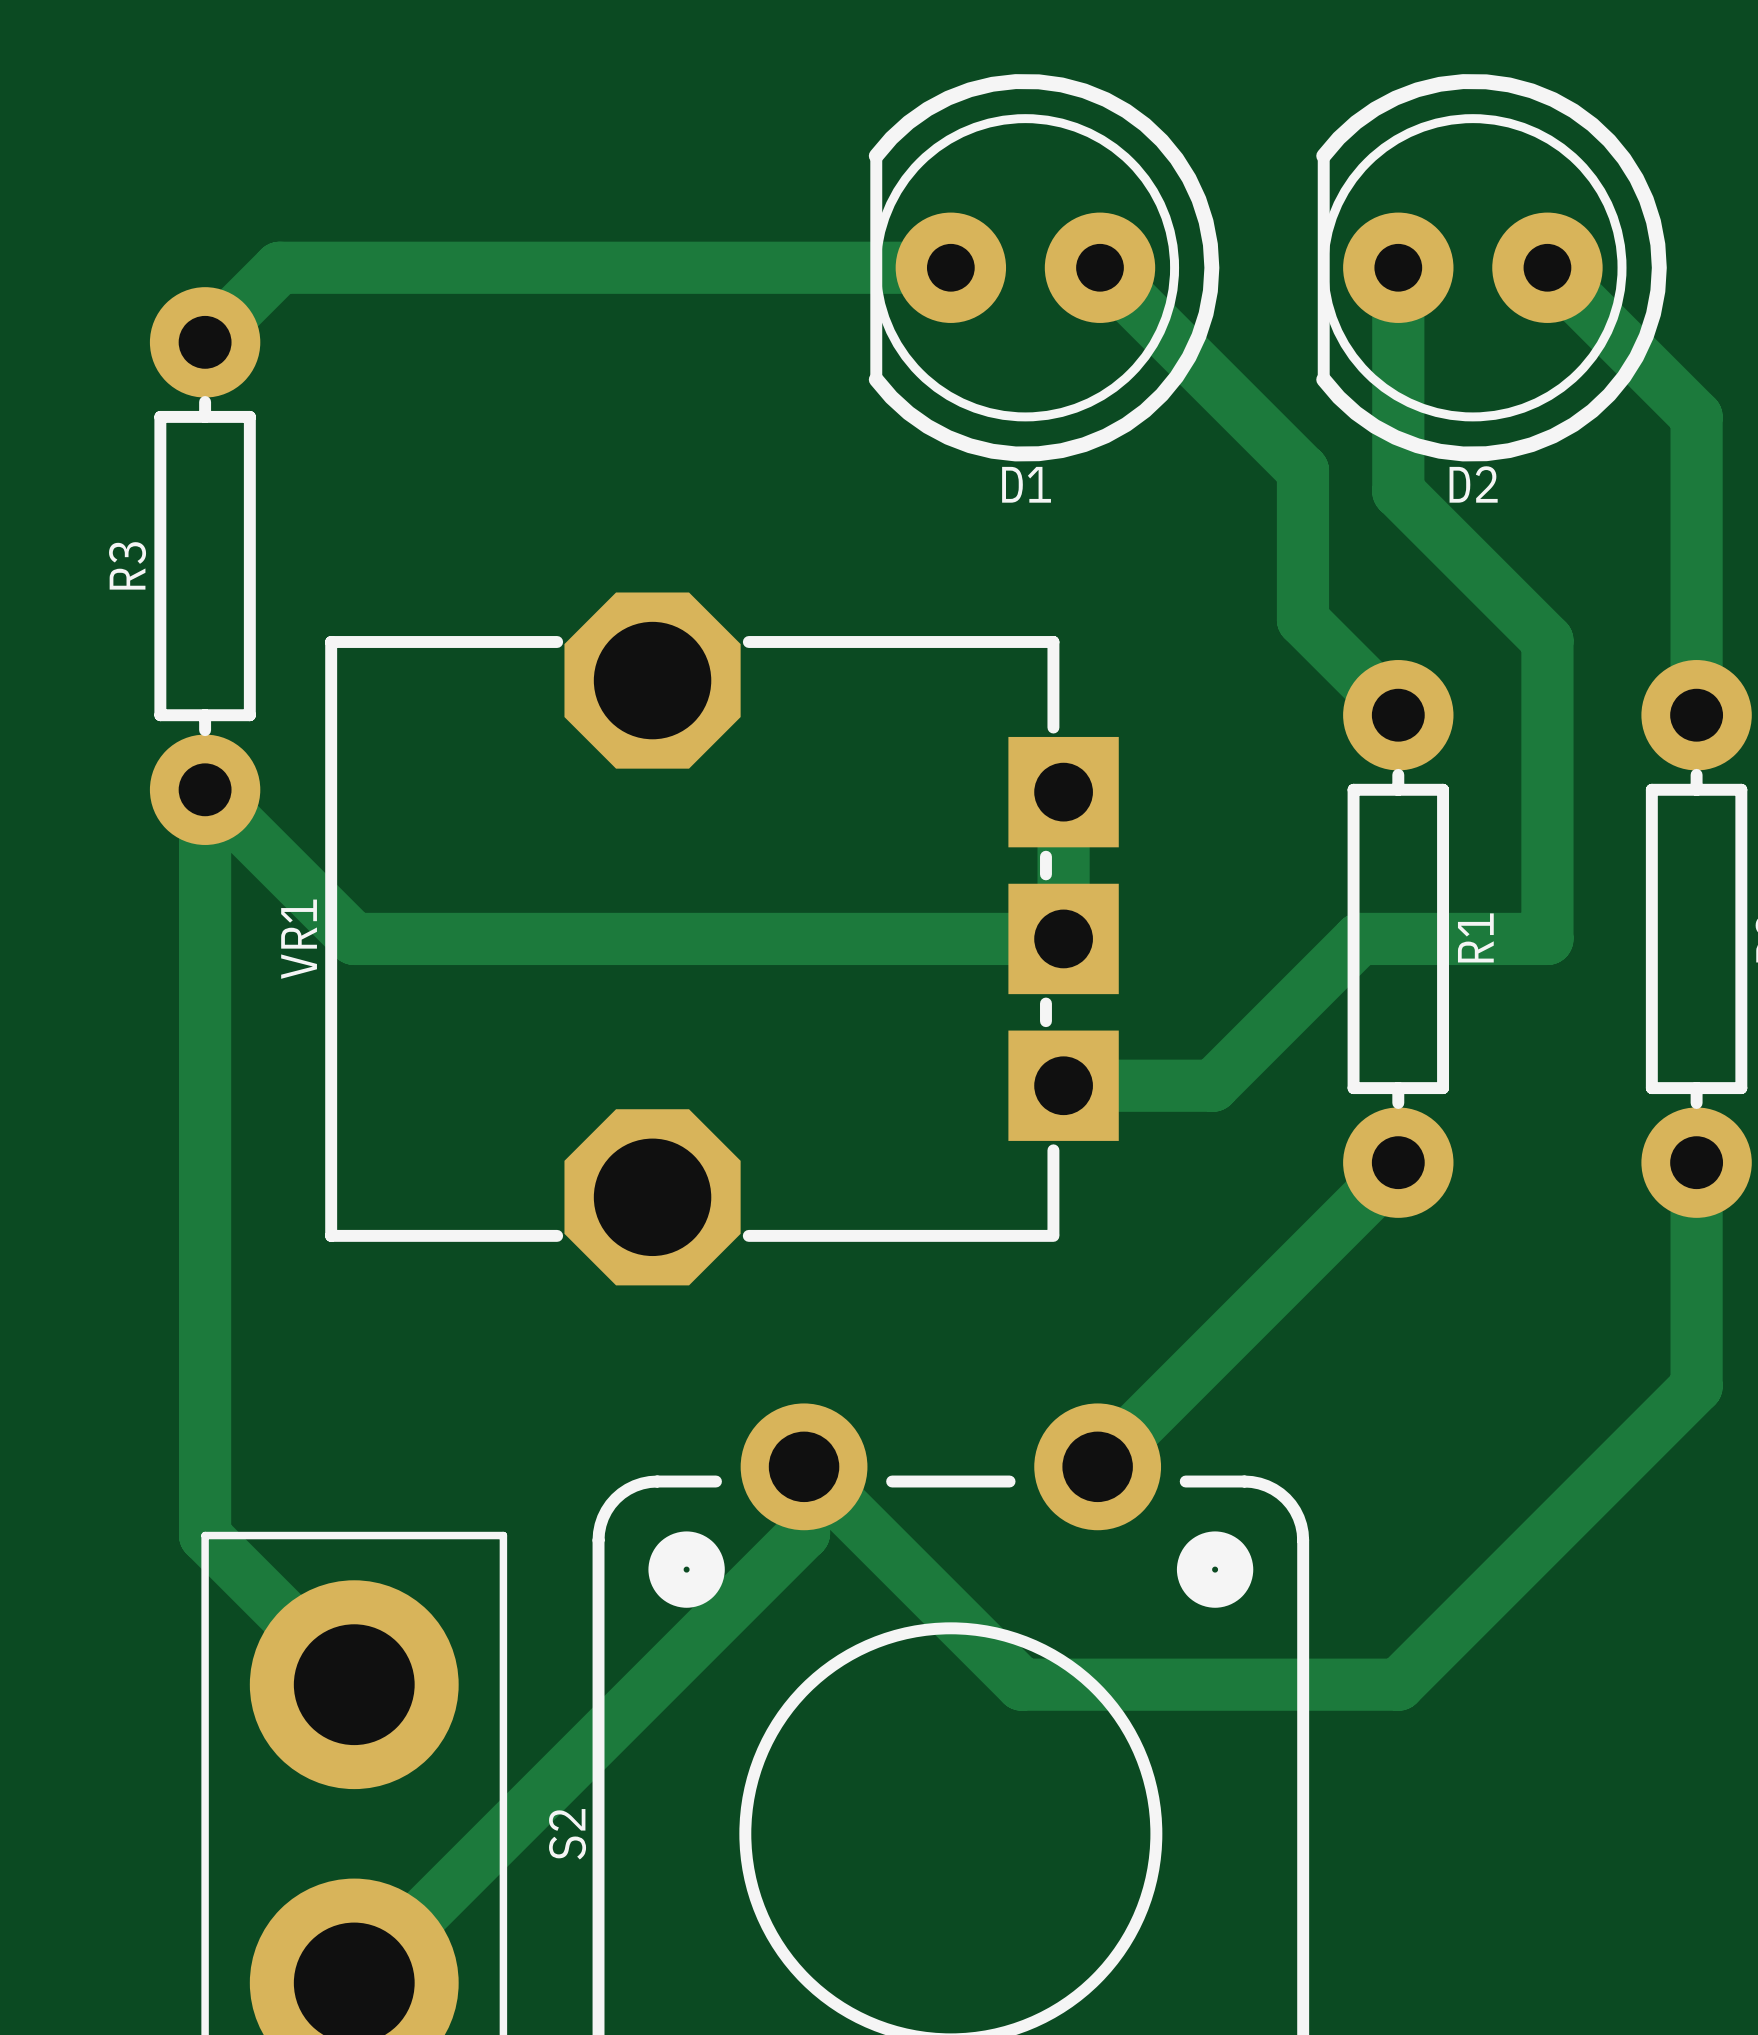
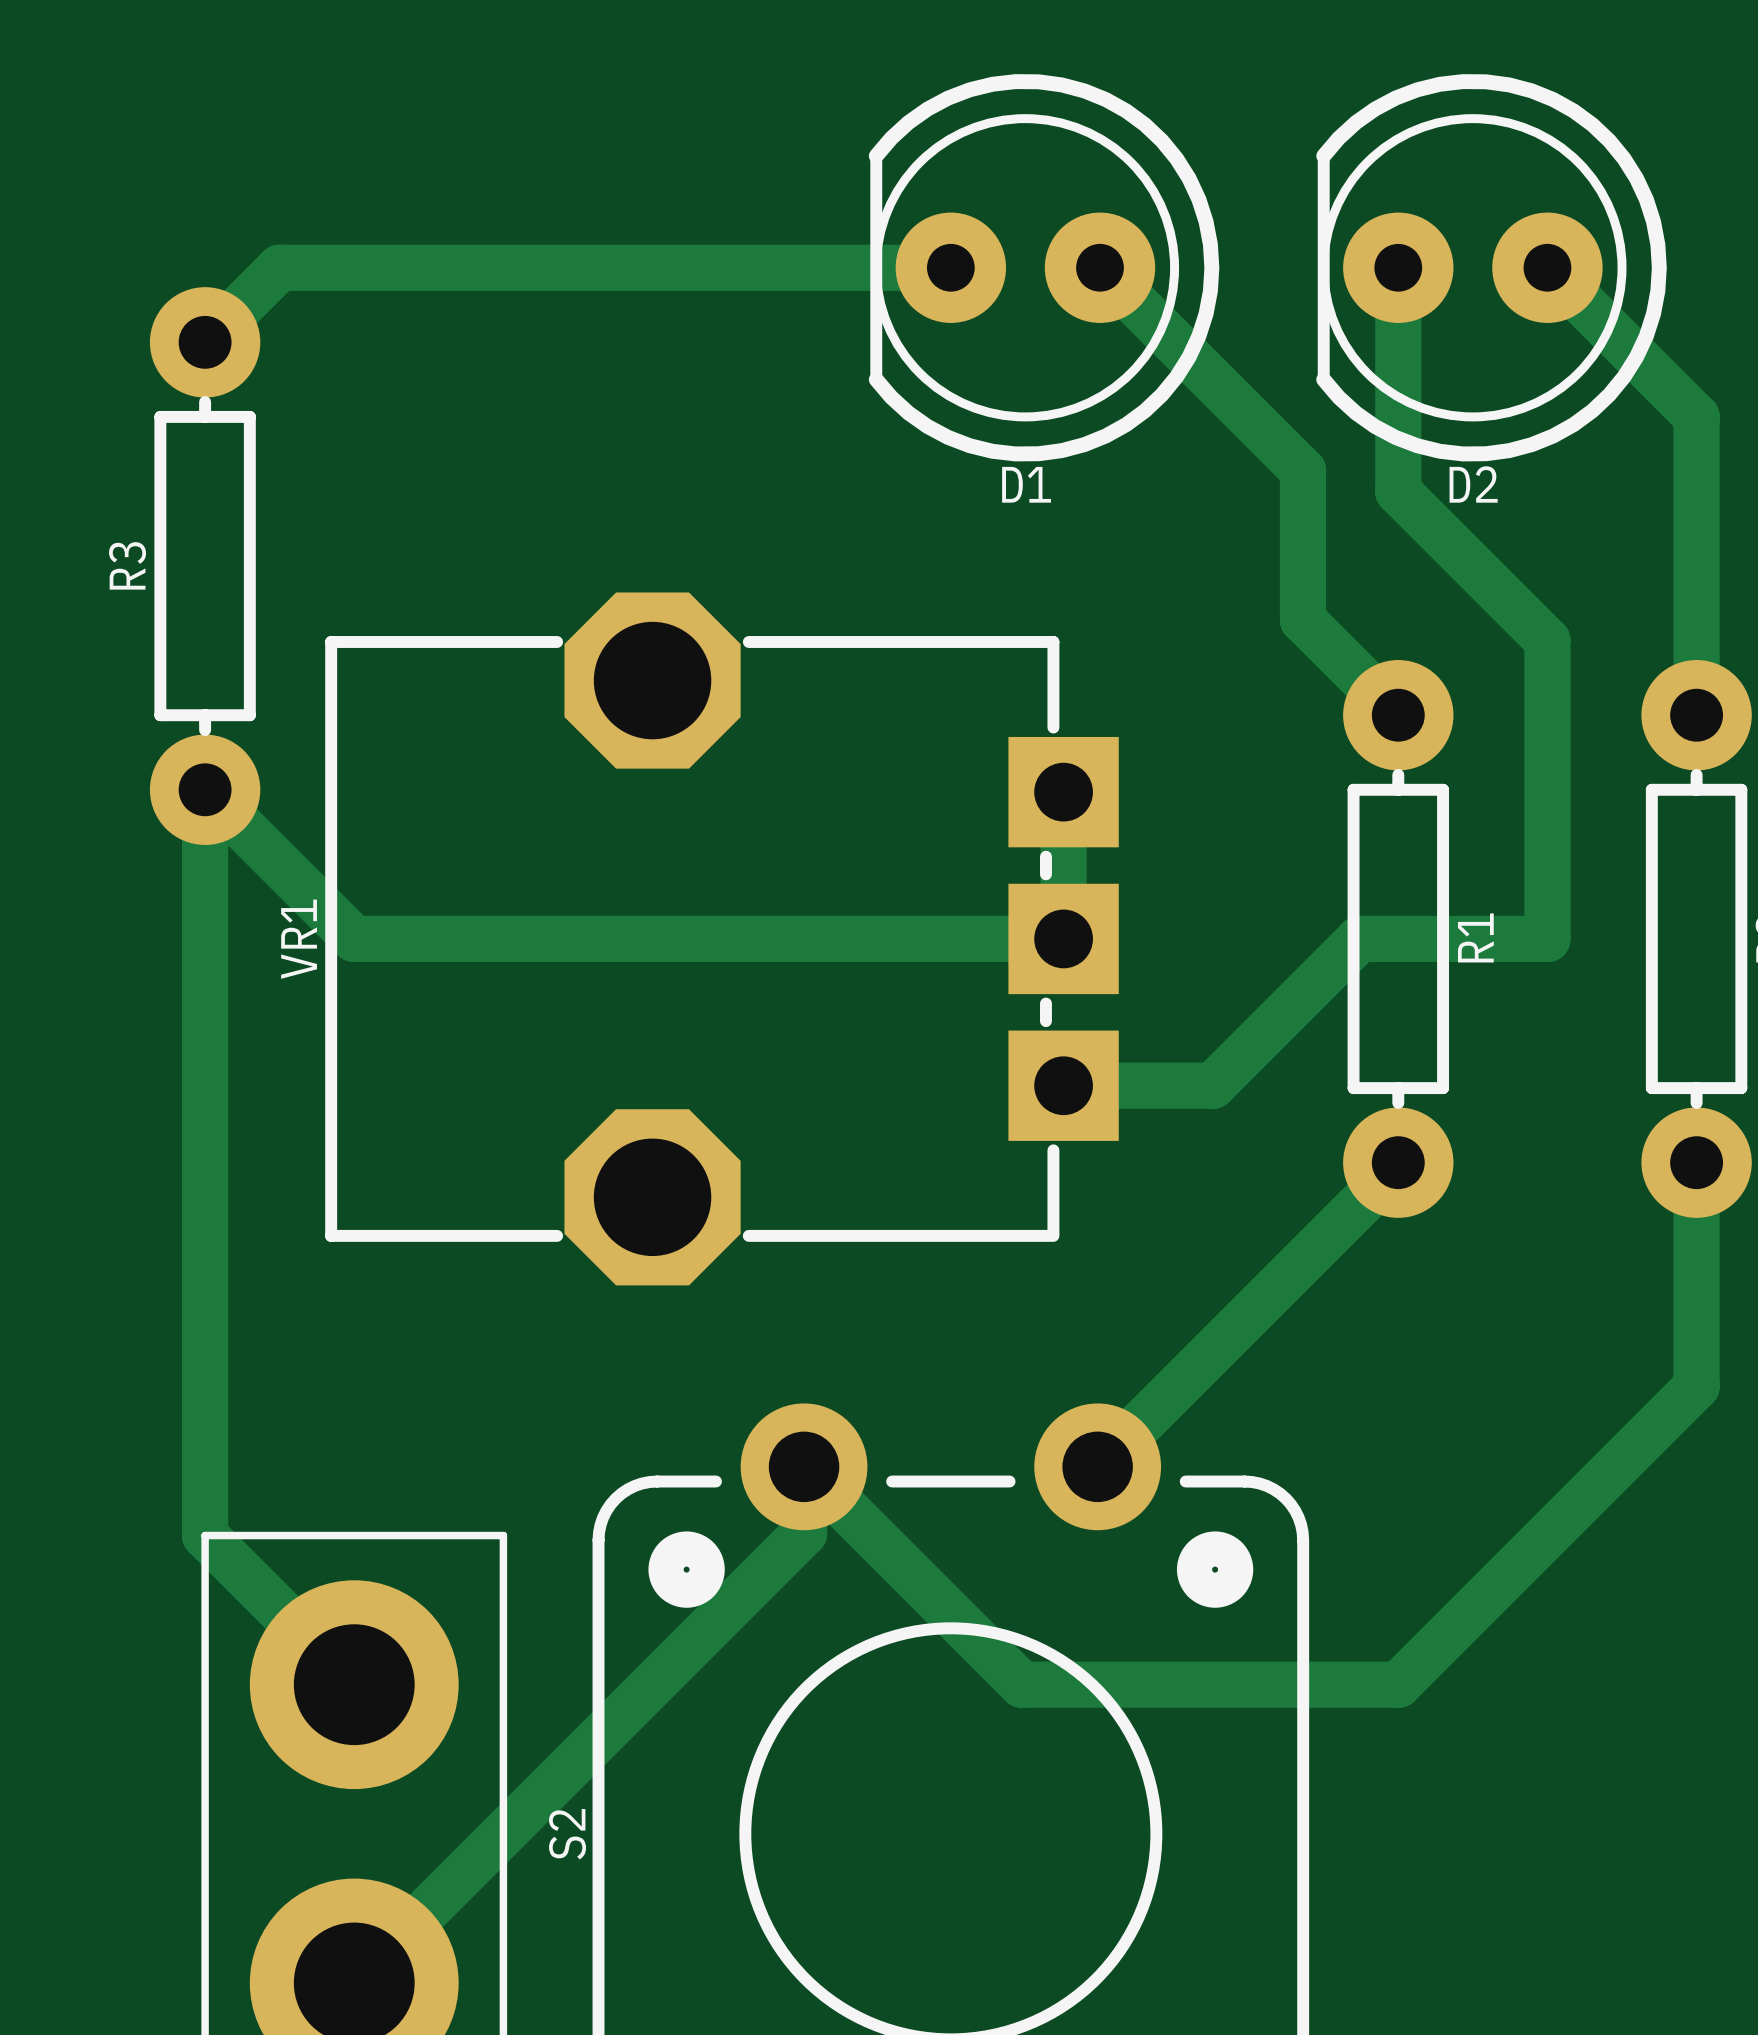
track width: thick (950, 267) (279, 267) (205, 342) -> thin (950, 267) (279, 267) (205, 342)
track width: thick (1100, 267) (1302, 470) (1302, 619) (1398, 715) -> thin (1100, 267) (1302, 470) (1302, 619) (1398, 715)
track width: thick (1398, 267) (1398, 491) (1547, 640) (1547, 938) (1359, 938) (1212, 1085) (1063, 1085) -> thin (1398, 267) (1398, 491) (1547, 640) (1547, 938) (1359, 938) (1212, 1085) (1063, 1085)
track width: thick (1547, 267) (1696, 416) (1696, 715) -> thin (1547, 267) (1696, 416) (1696, 715)
track width: thick (1063, 792) (1063, 938) (354, 938) (205, 789) (205, 1535) (354, 1684) -> thin (1063, 792) (1063, 938) (354, 938) (205, 789) (205, 1535) (354, 1684)
track width: thick (1398, 1162) (1398, 1166) (1097, 1466) -> thin (1398, 1162) (1398, 1166) (1097, 1466)
track width: thick (1696, 1162) (1696, 1386) (1398, 1684) (1021, 1684) (804, 1466) (804, 1533) (354, 1982) -> thin (1696, 1162) (1696, 1386) (1398, 1684) (1021, 1684) (804, 1466) (804, 1533) (354, 1982)

